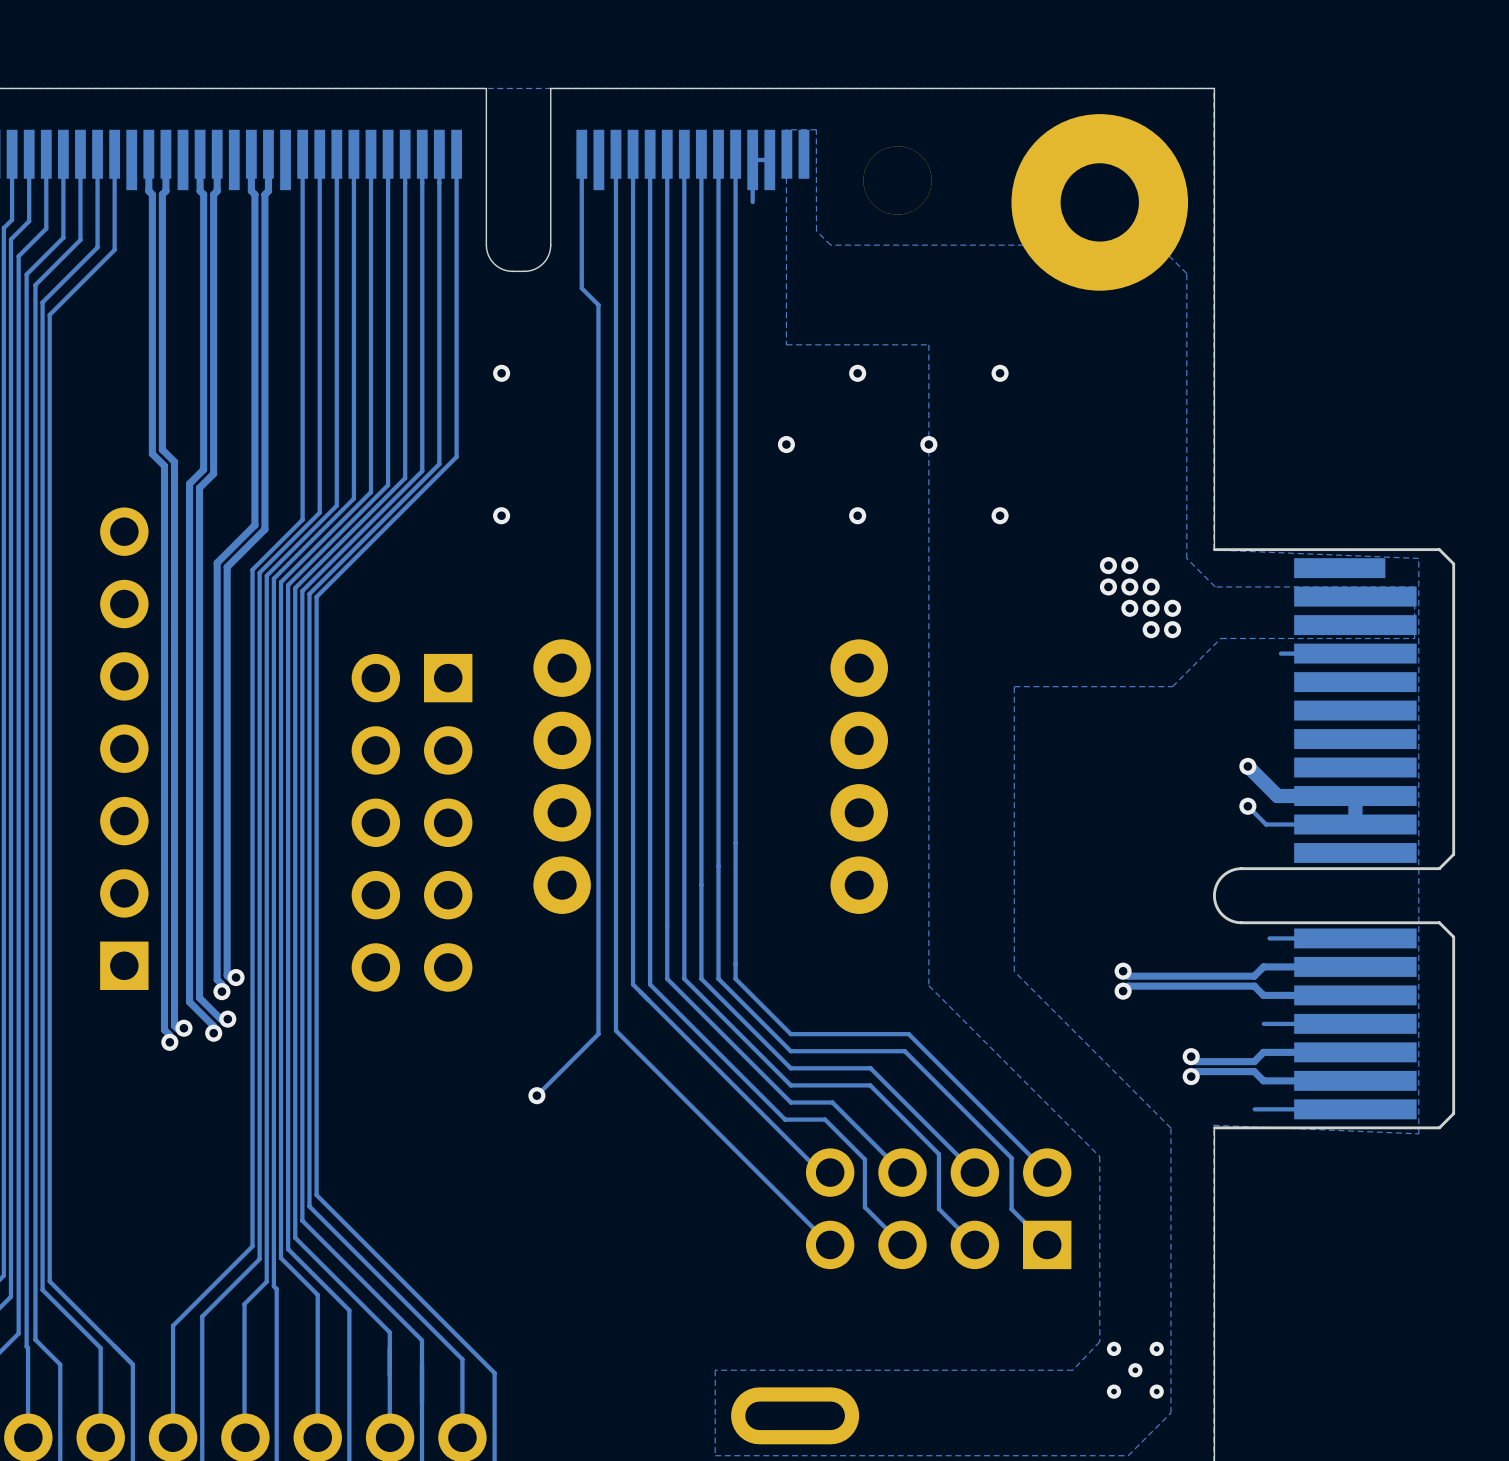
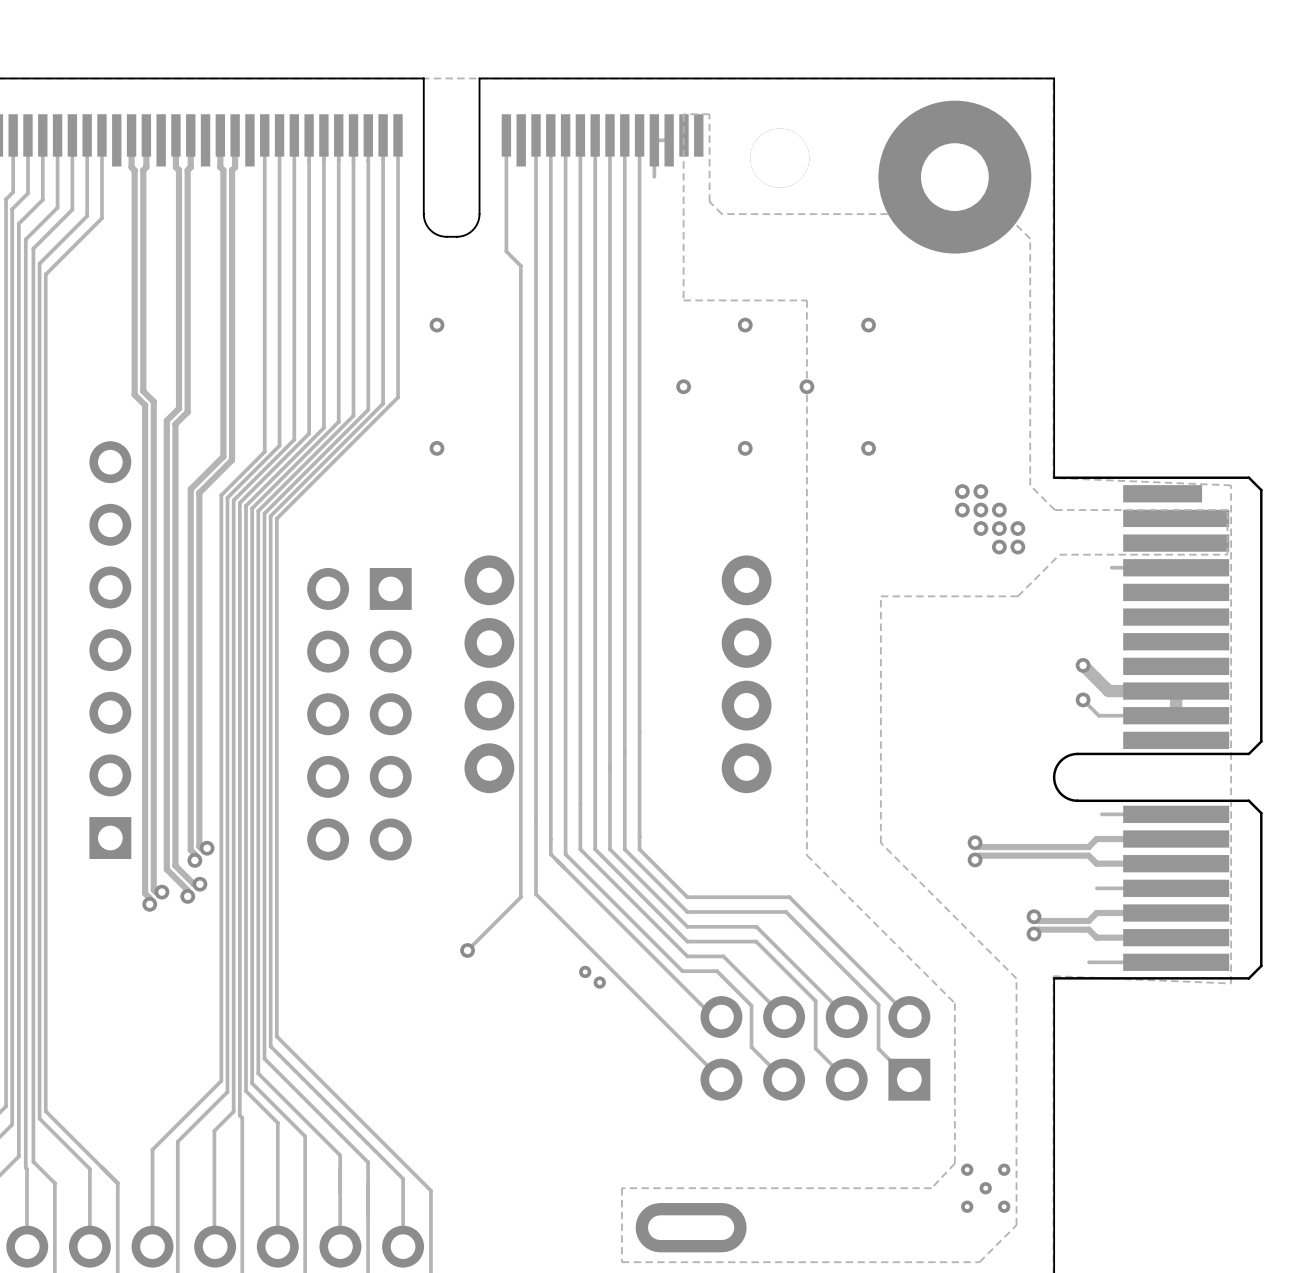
via: none -> (585, 971)
via: none -> (599, 982)

